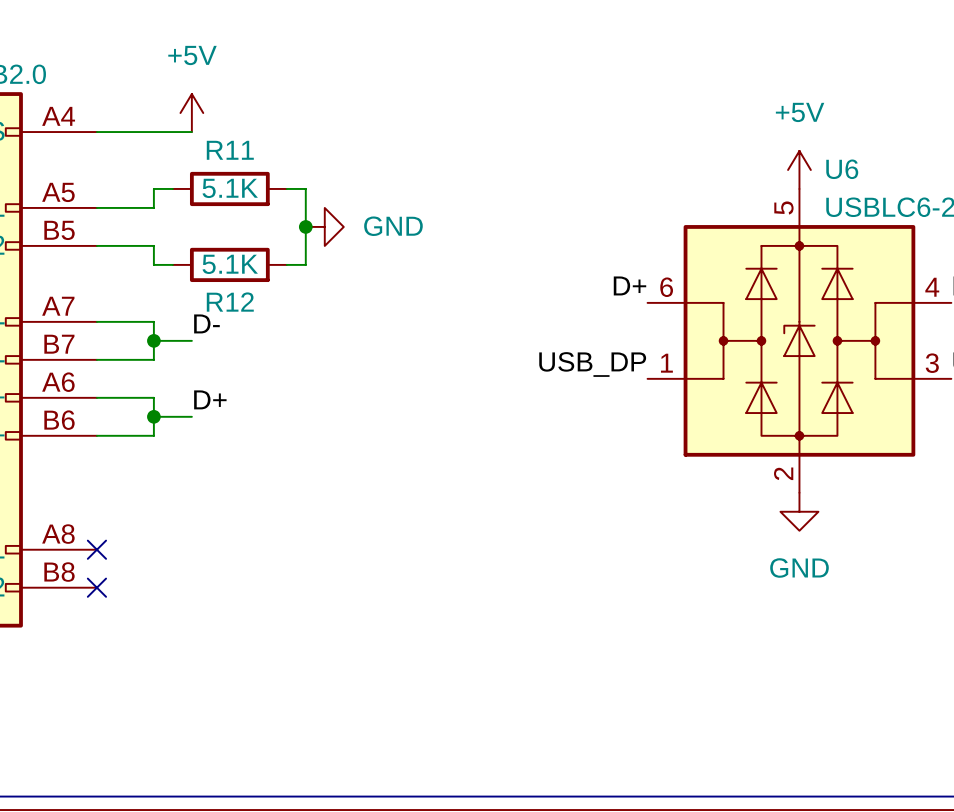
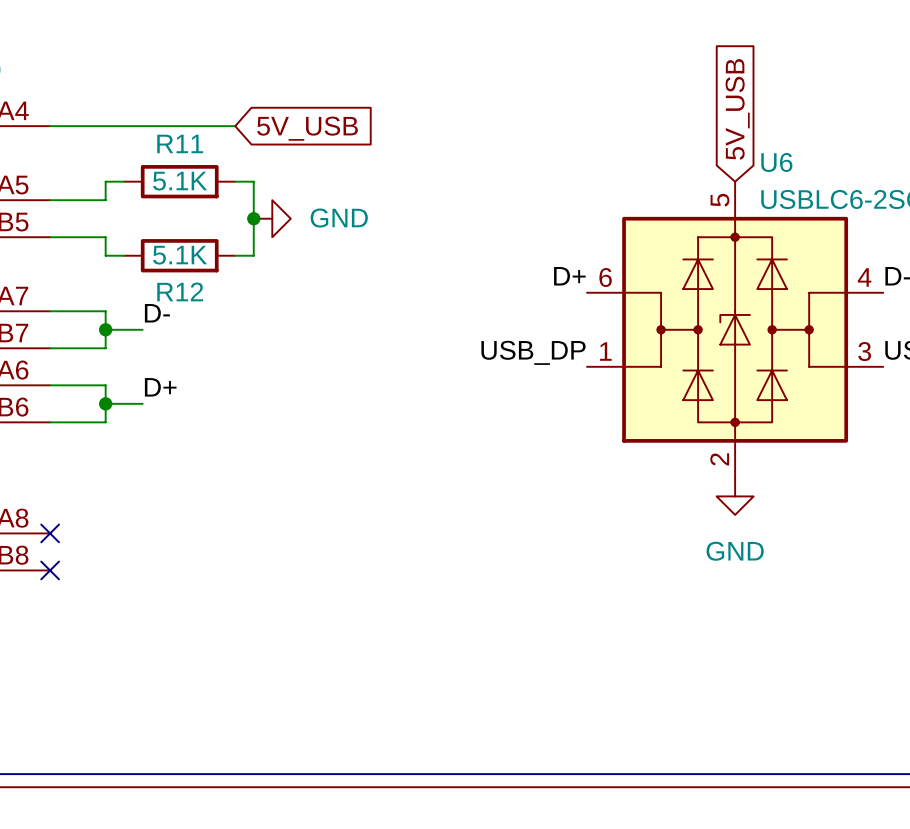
power symbol: +5V (191, 113) -> none
global label: none -> 5V_USB (737, 109)
wire: none -> (142, 126) (235, 126)
global label: none -> 5V_USB (307, 128)
power symbol: +5V (799, 169) -> none

